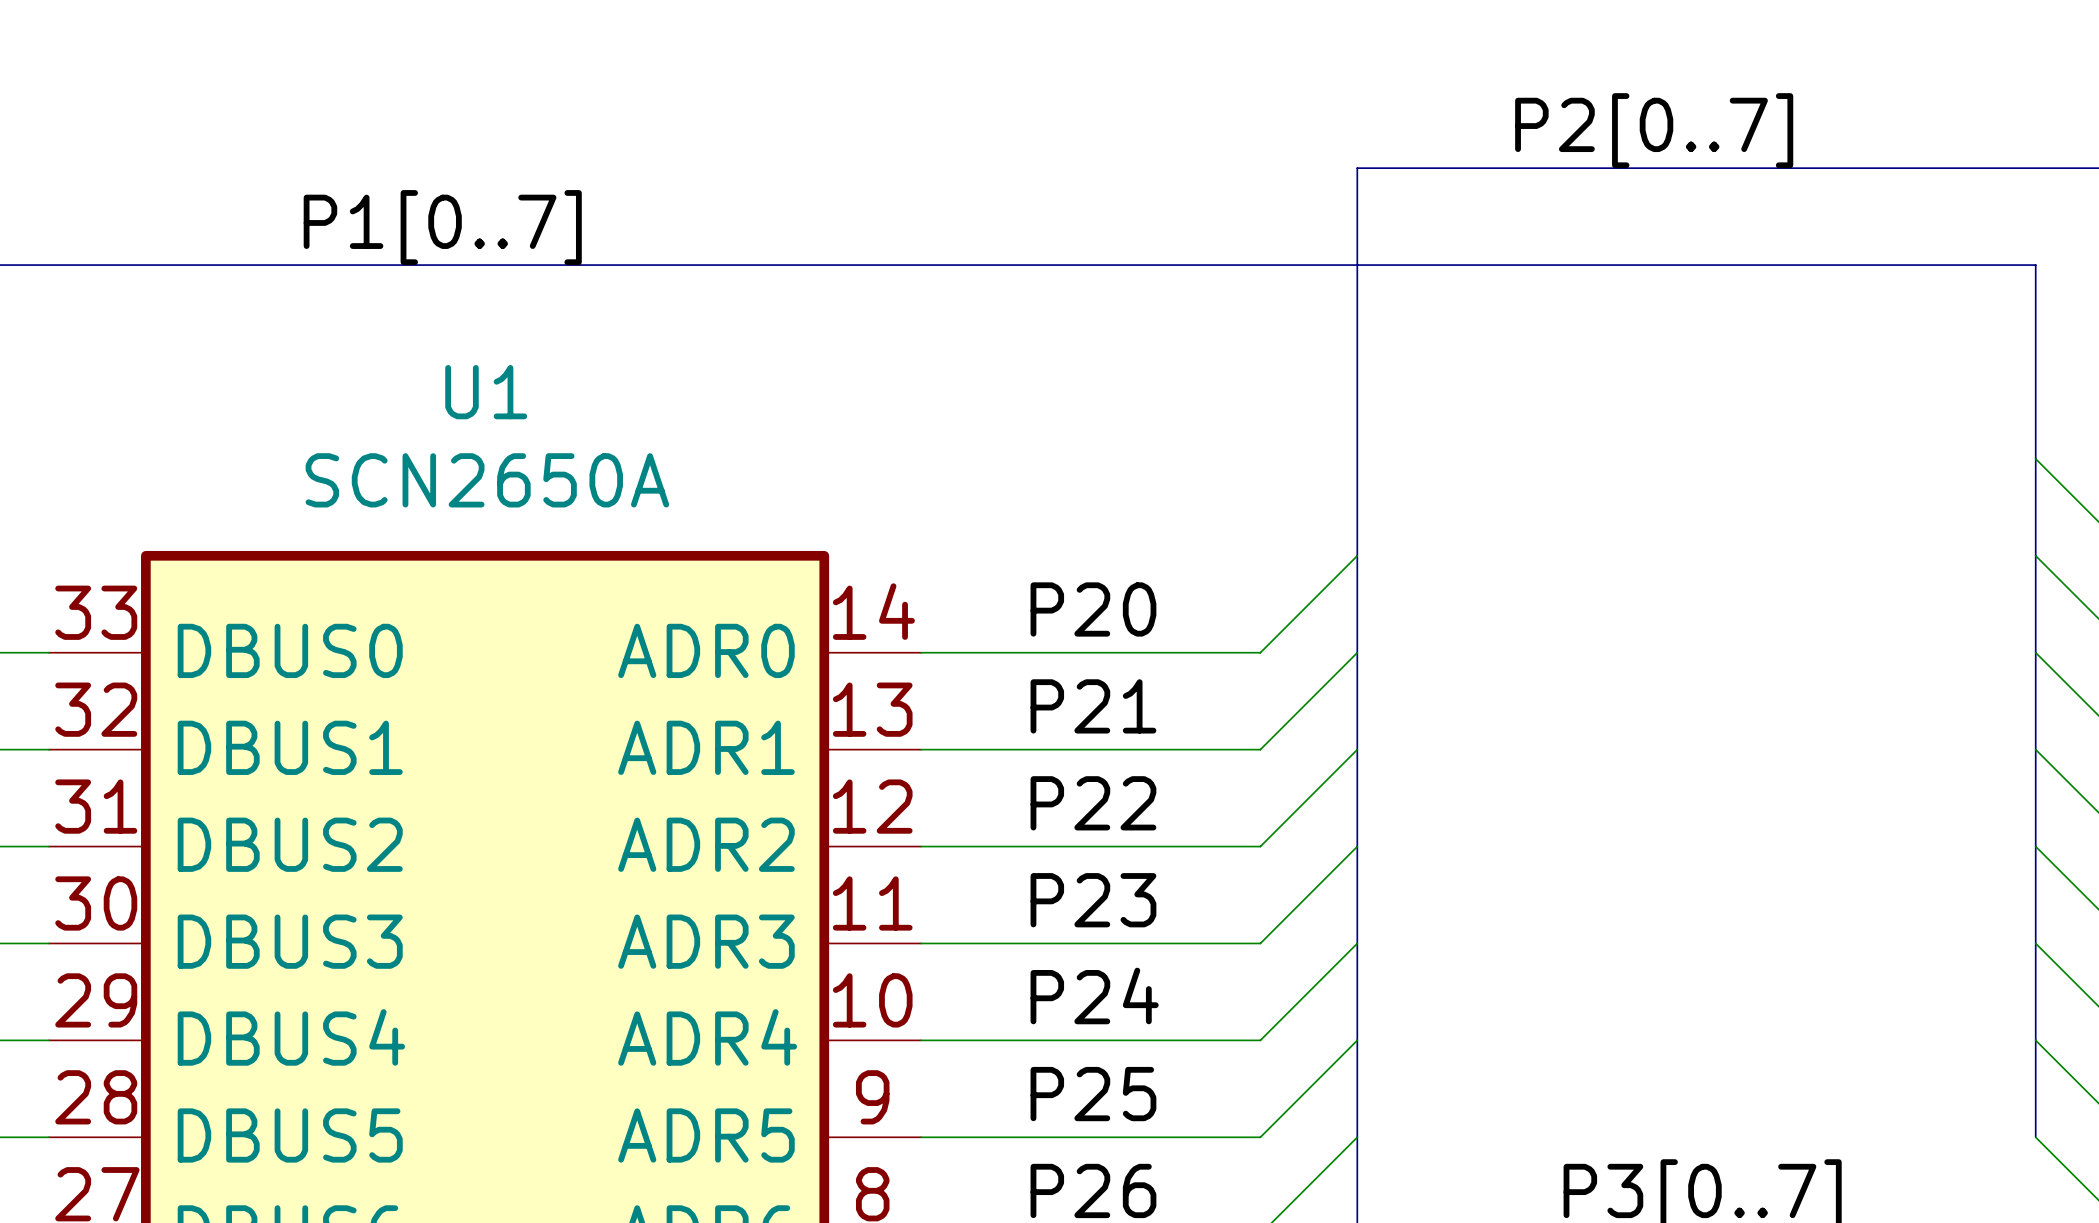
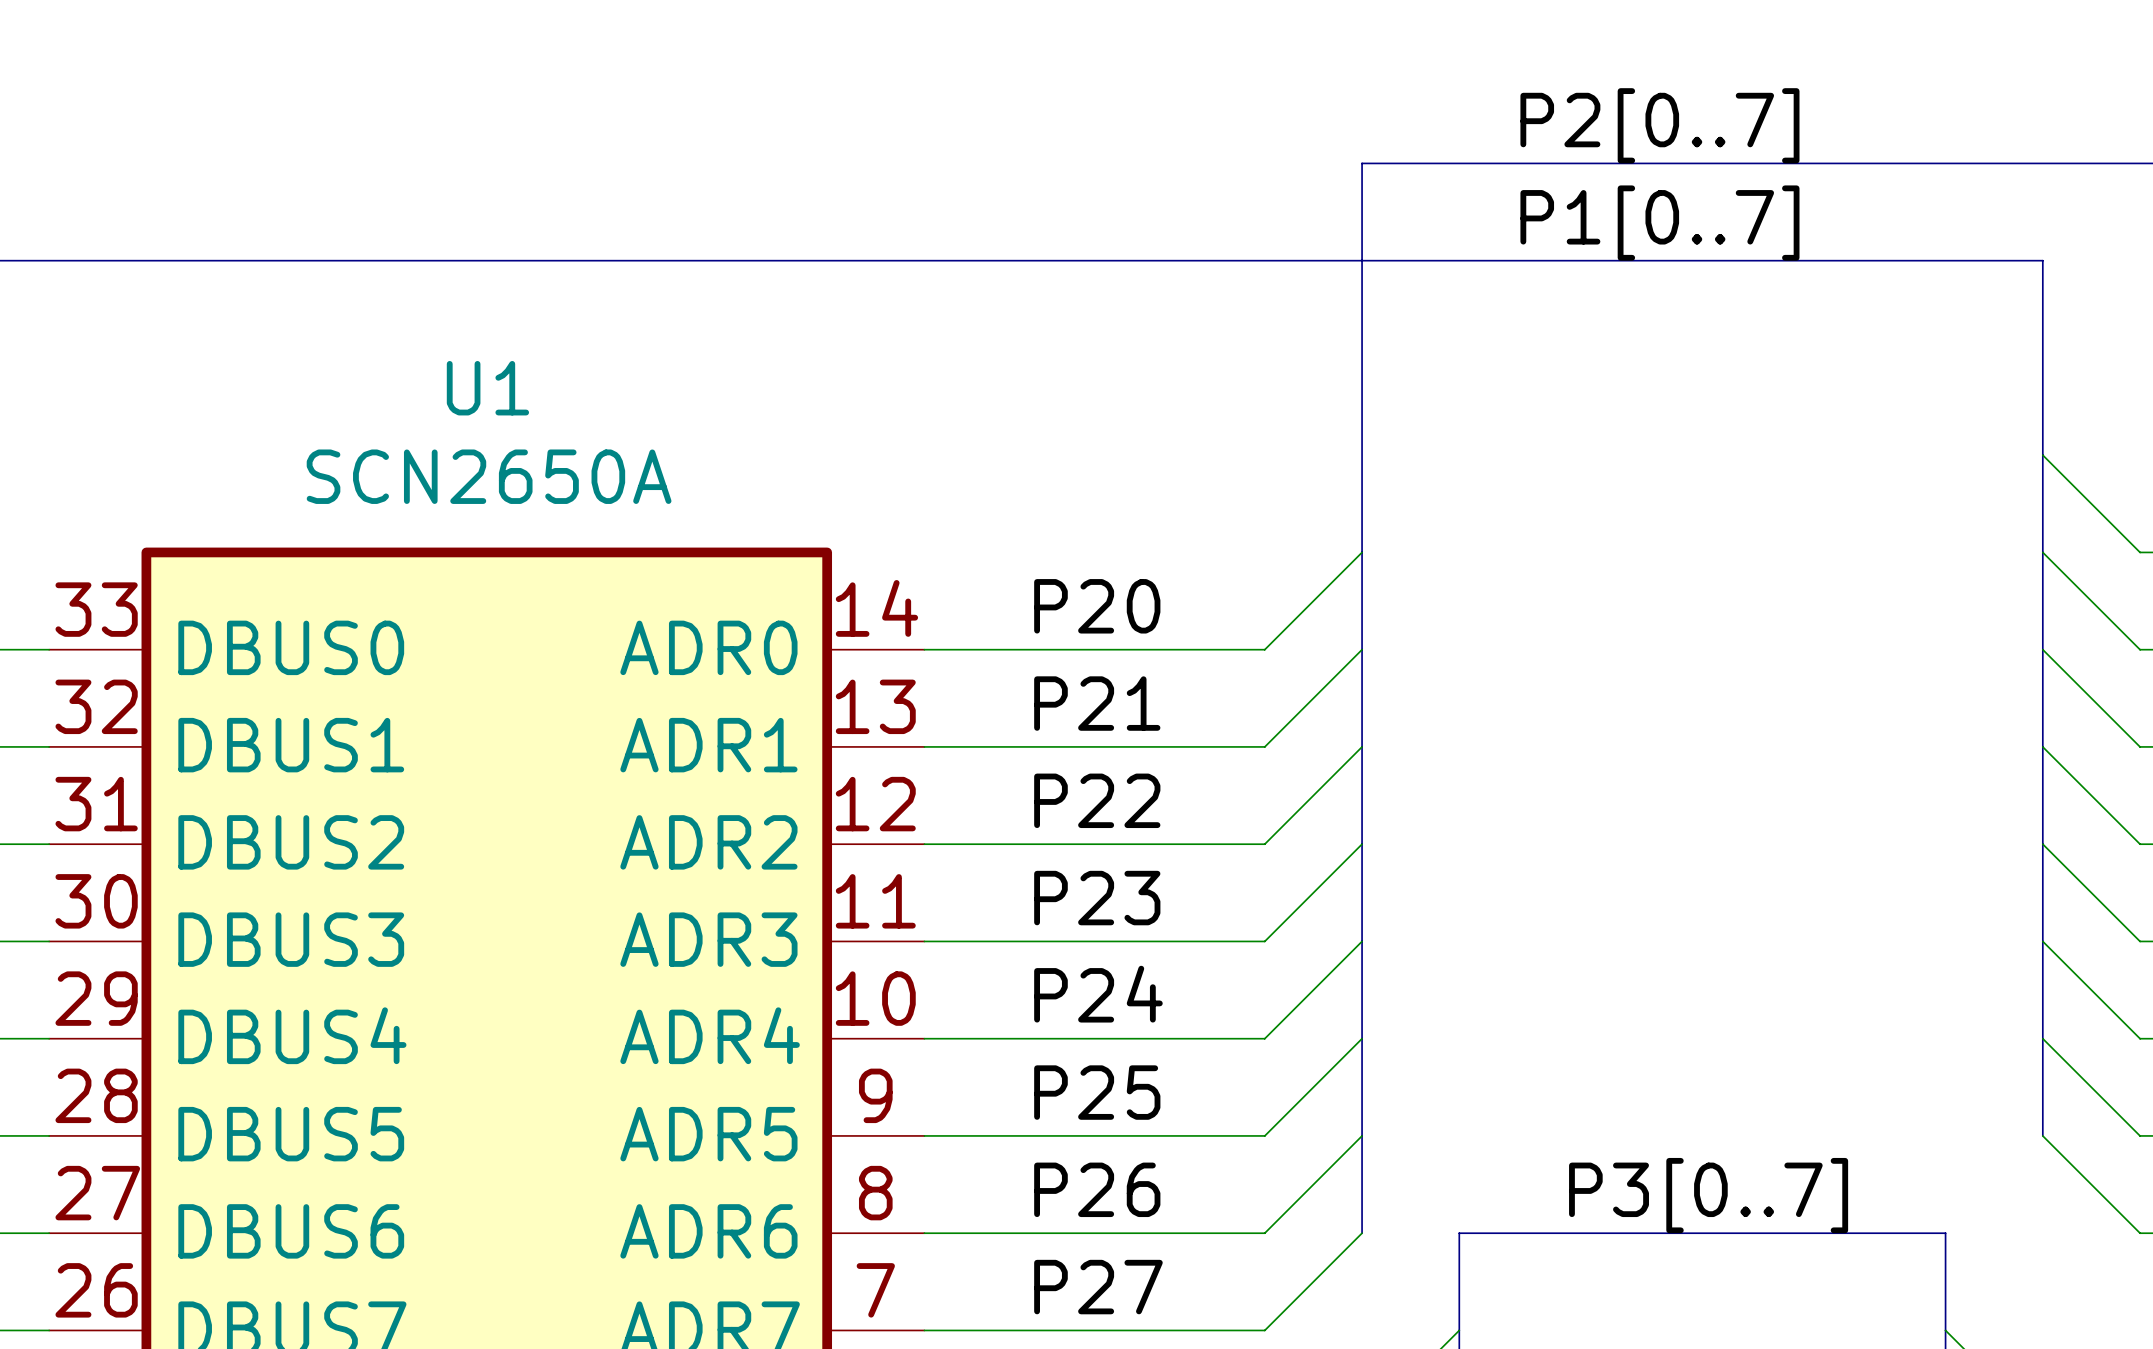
label: P1[0..7] (442, 227) -> none
label: none -> P1[0..7] (1659, 223)

